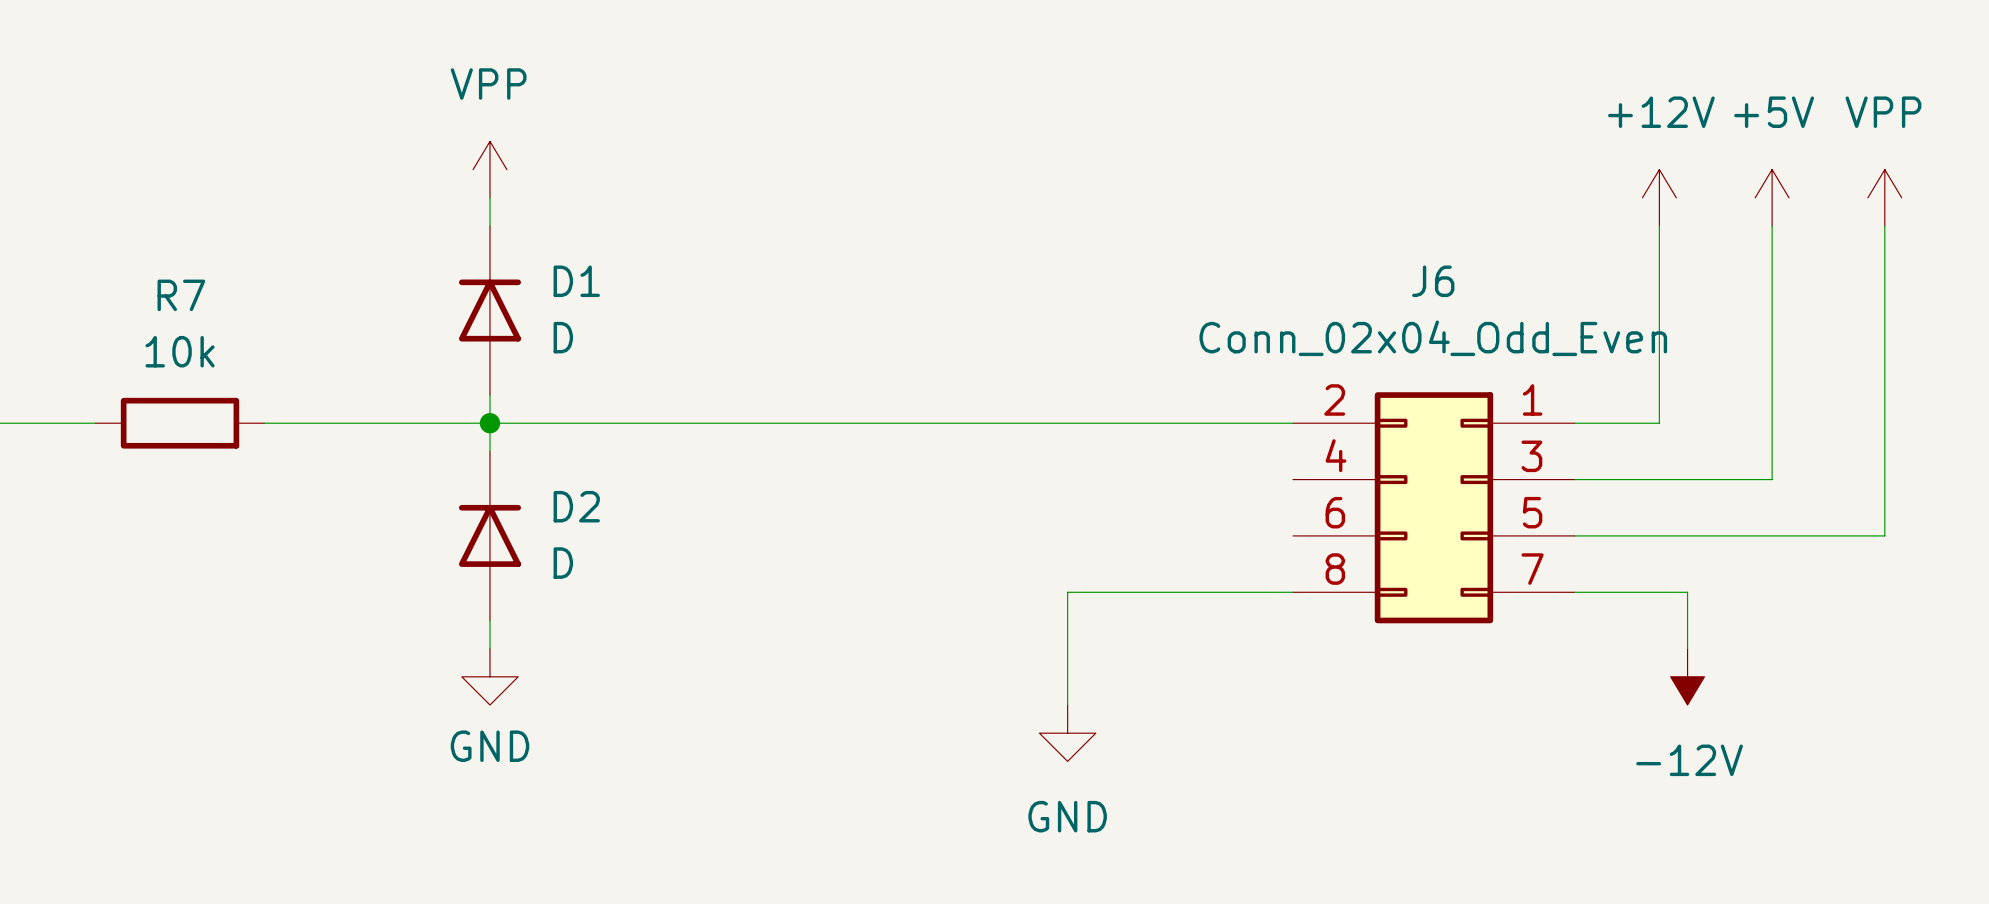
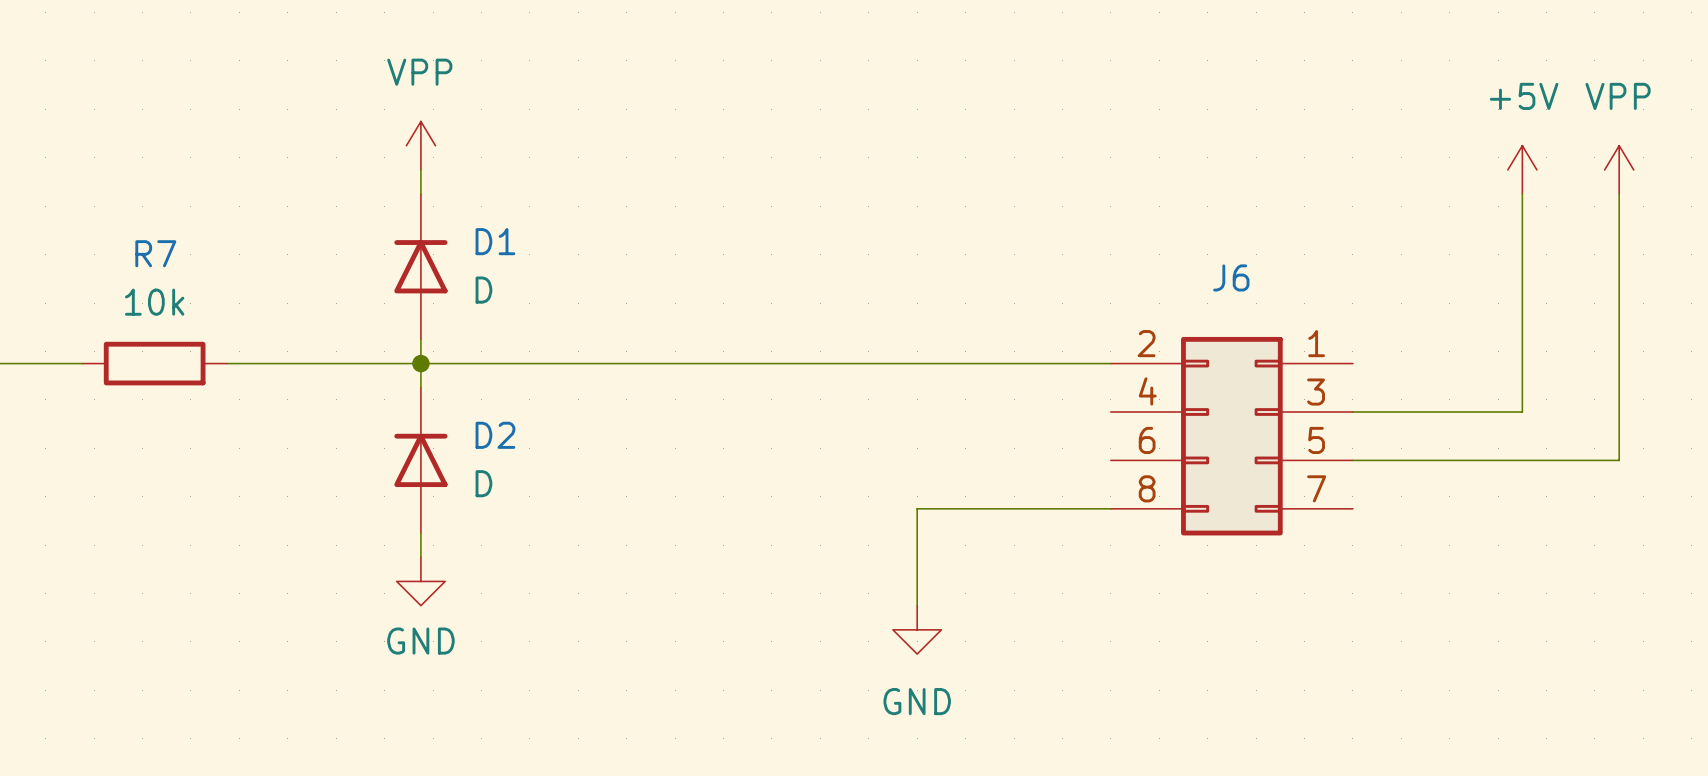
power symbol: +12V (1659, 197) -> none
wire: (1659, 225) (1659, 423) (1574, 423) -> none
J6 name position: J6 (1433, 281) -> J6 (1231, 277)
J6 value: Conn_02x04_Odd_Even (1433, 338) -> none
wire: (1574, 592) (1687, 592) (1687, 648) -> none
power symbol: -12V (1687, 676) -> none

